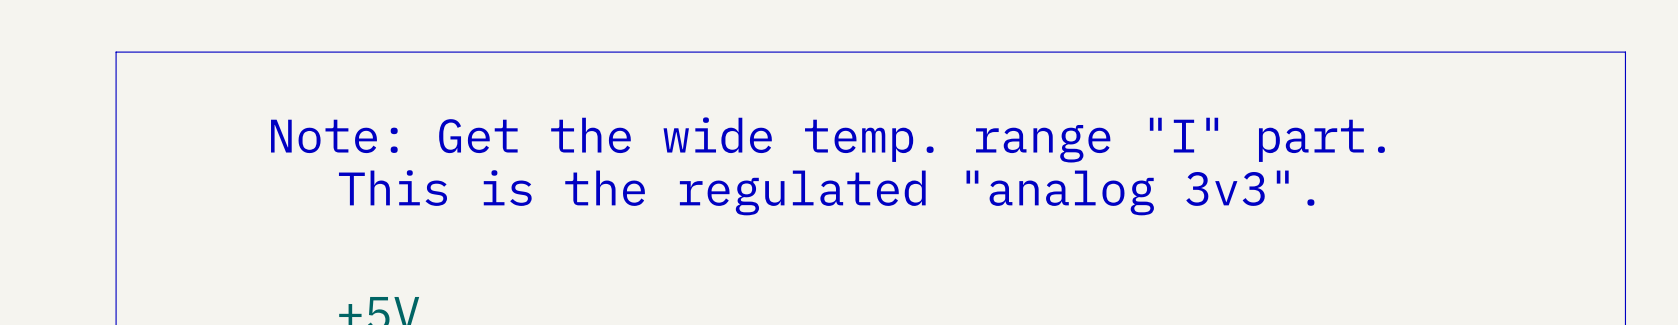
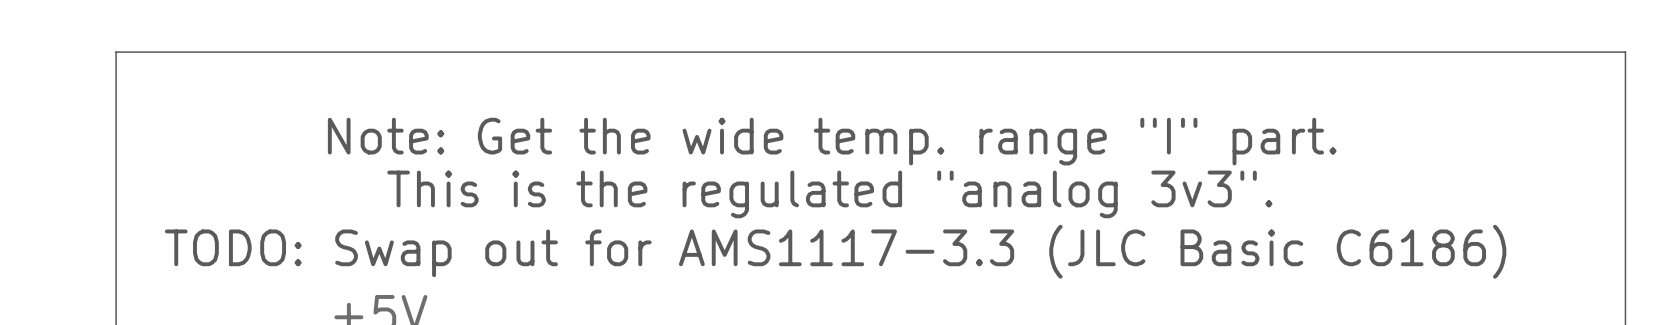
text: none -> TODO: Swap out for AMS1117-3.3 (JLC Basic C6186) (835, 251)

